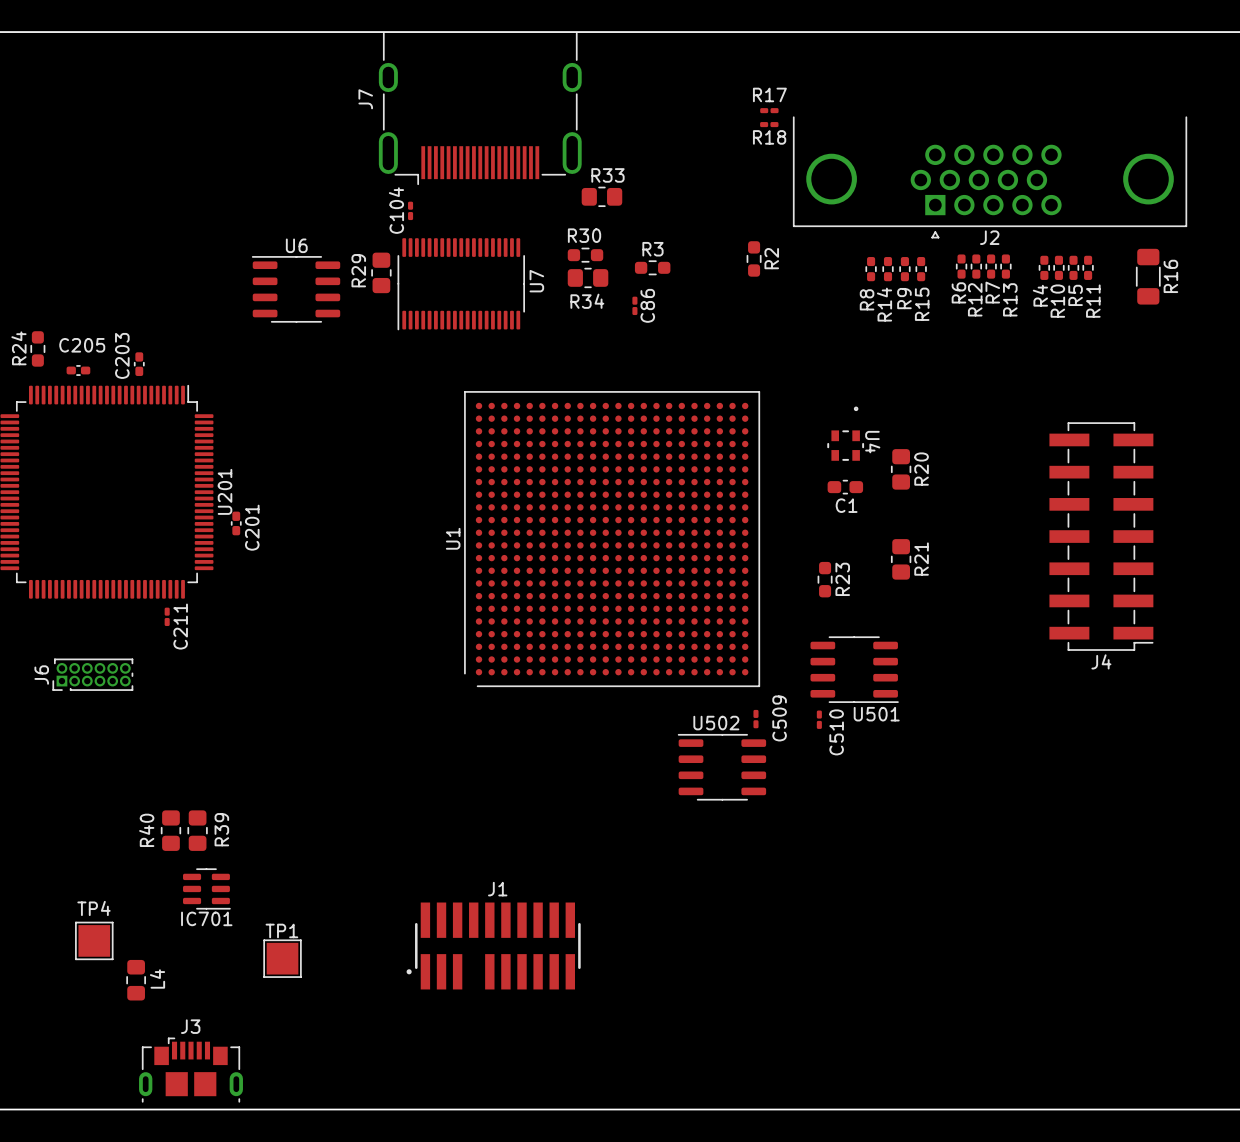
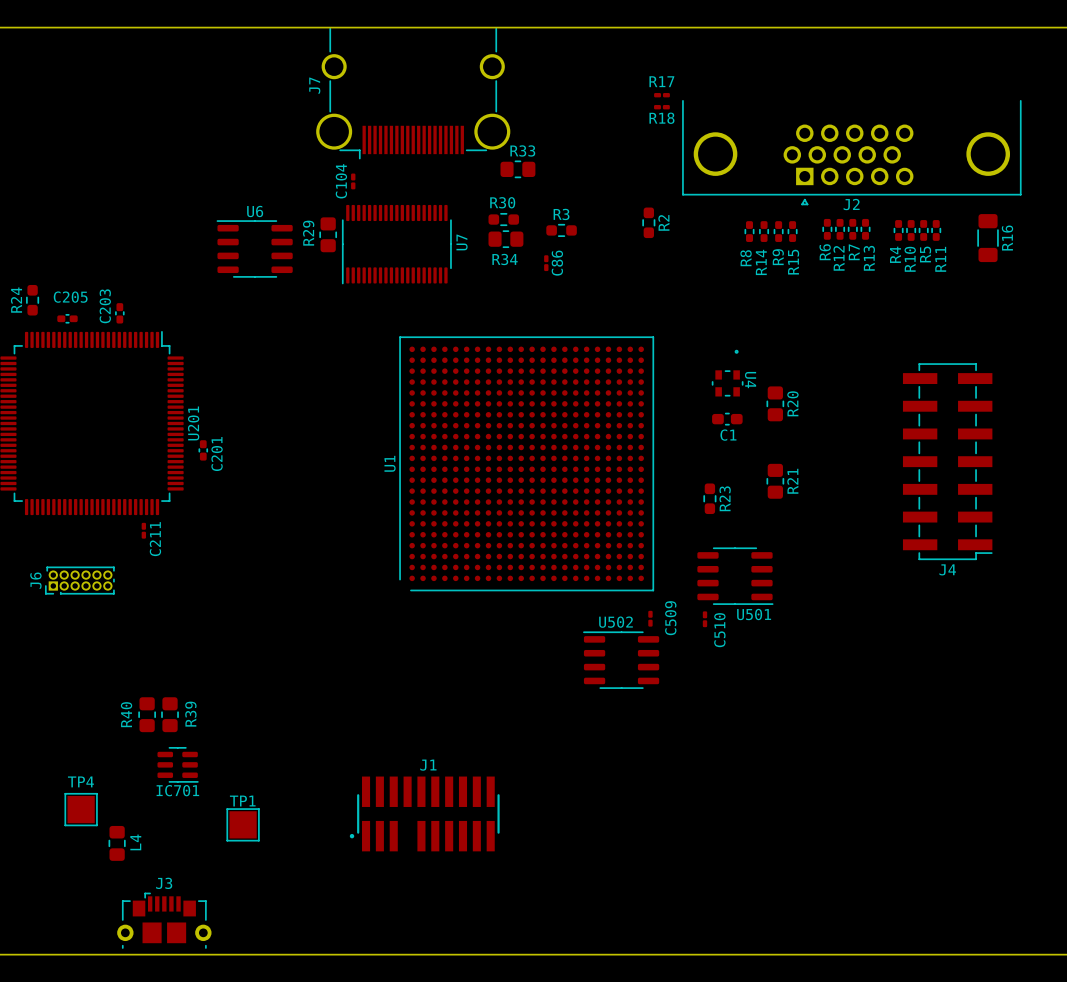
J7 footprint: [378, 32, 582, 185] -> [316, 28, 511, 160]
J3 footprint: [139, 1037, 243, 1103] -> [117, 892, 212, 949]

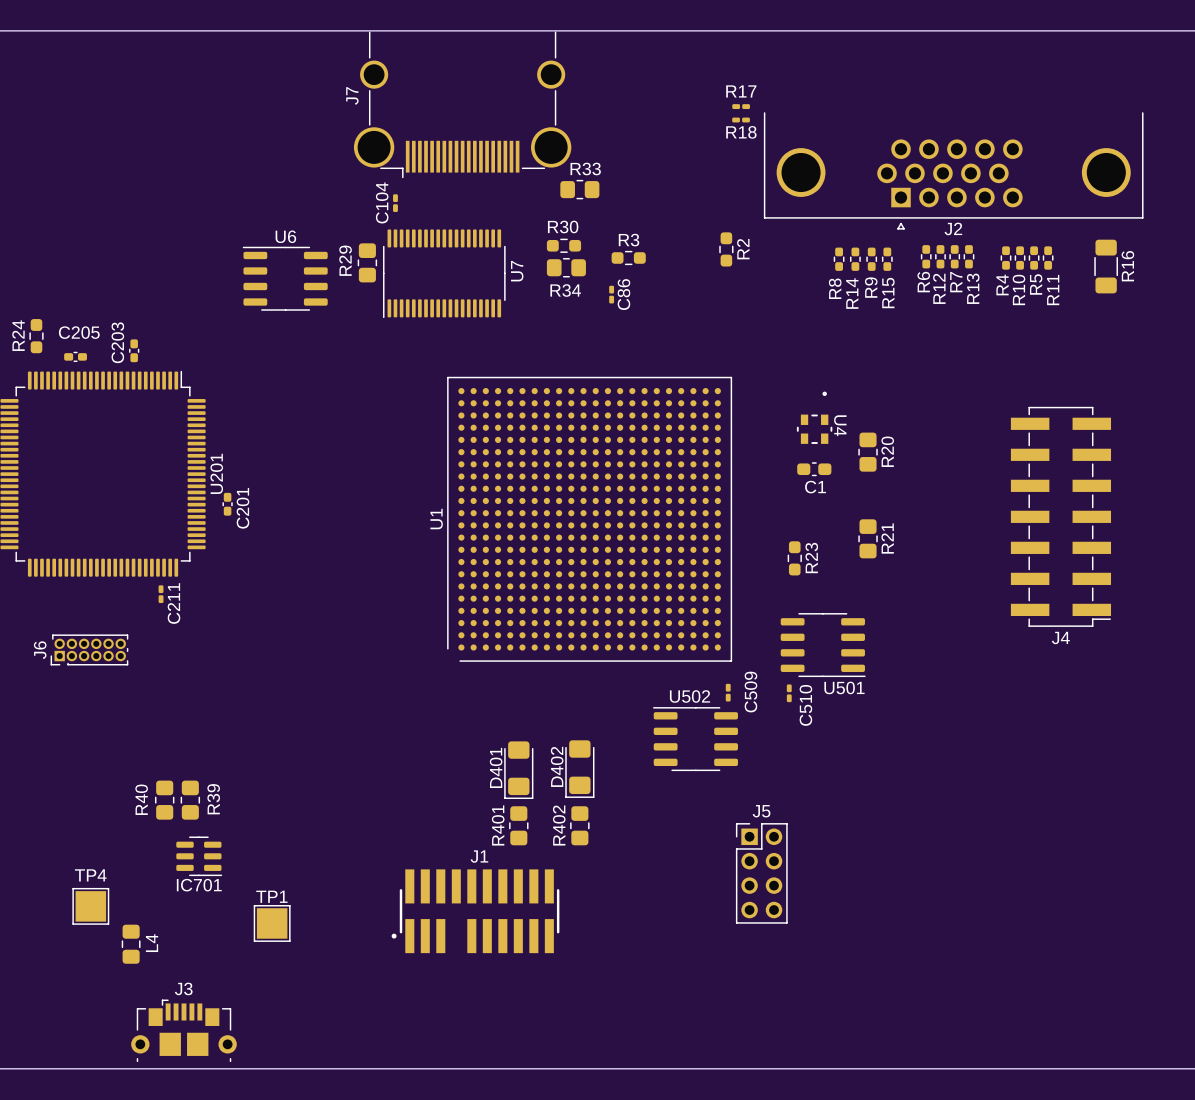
D401: none -> (518, 770)
D402: none -> (579, 769)
R401: none -> (518, 825)
R402: none -> (579, 825)
J5: none -> (761, 873)

